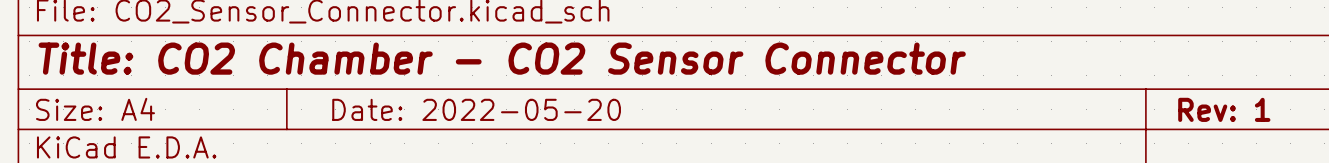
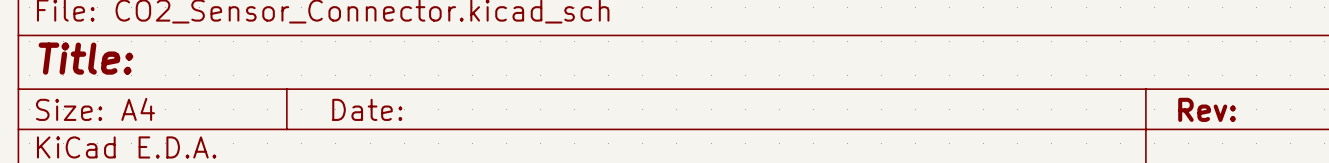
title block: Title: CO2 Chamber - CO2 Sensor Connector (502, 58) -> Title: (85, 58)
title block: Date: 2022-05-20 (476, 109) -> Date: (367, 109)
title block: Rev: 1 (1224, 109) -> Rev: (1207, 109)

